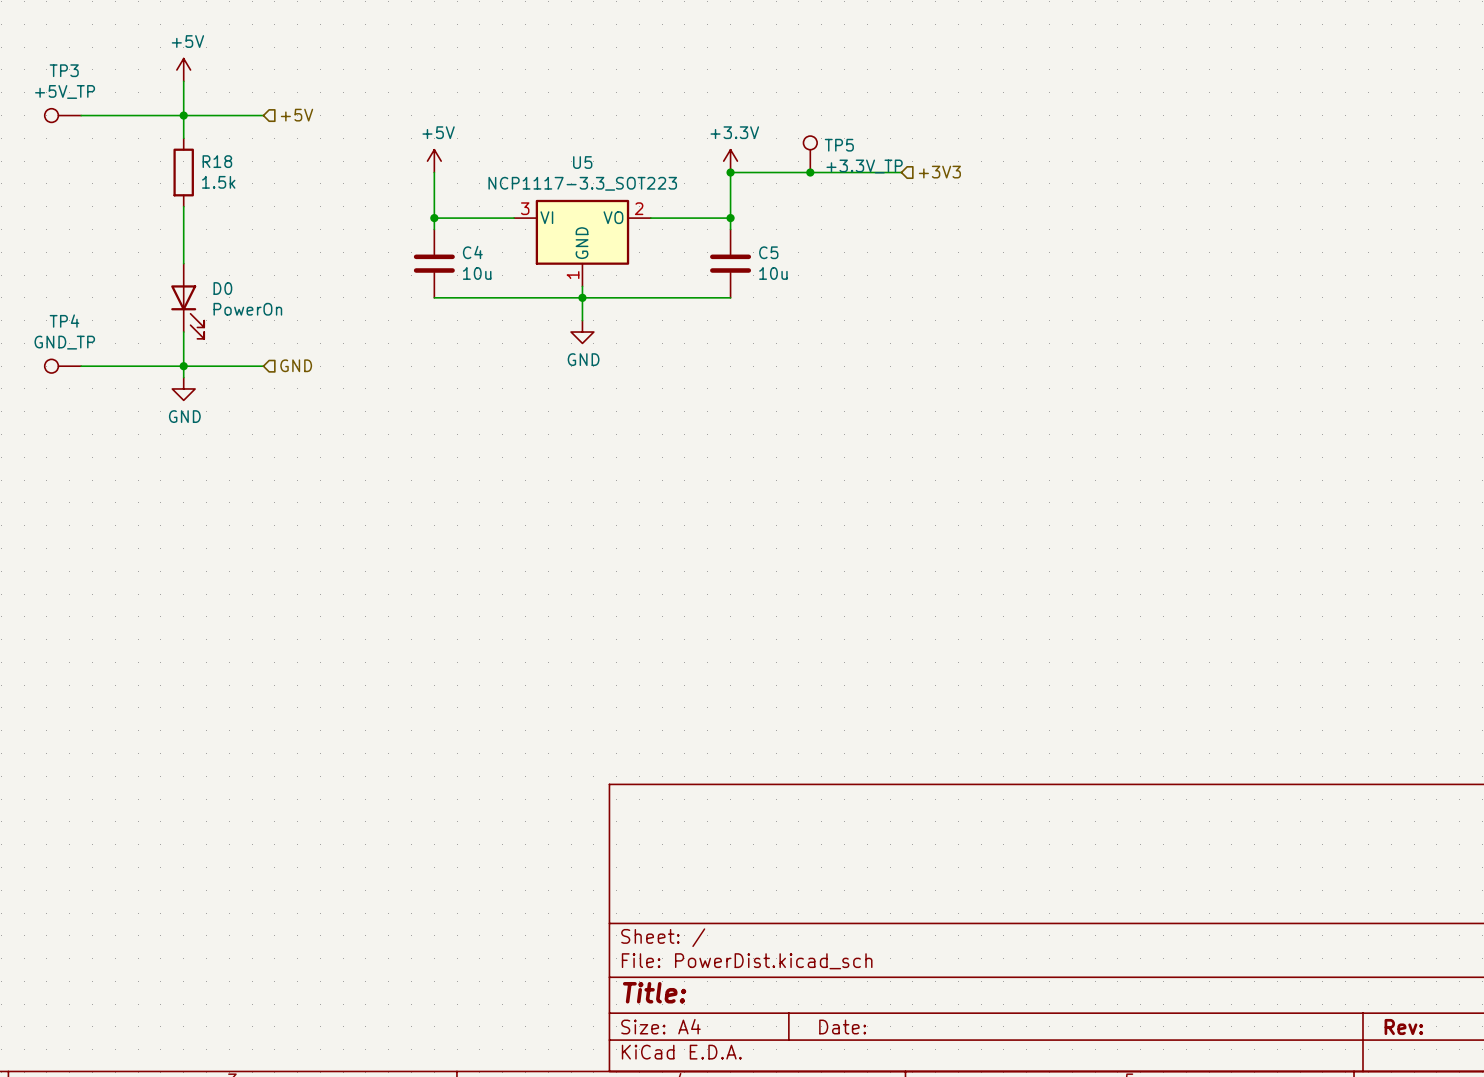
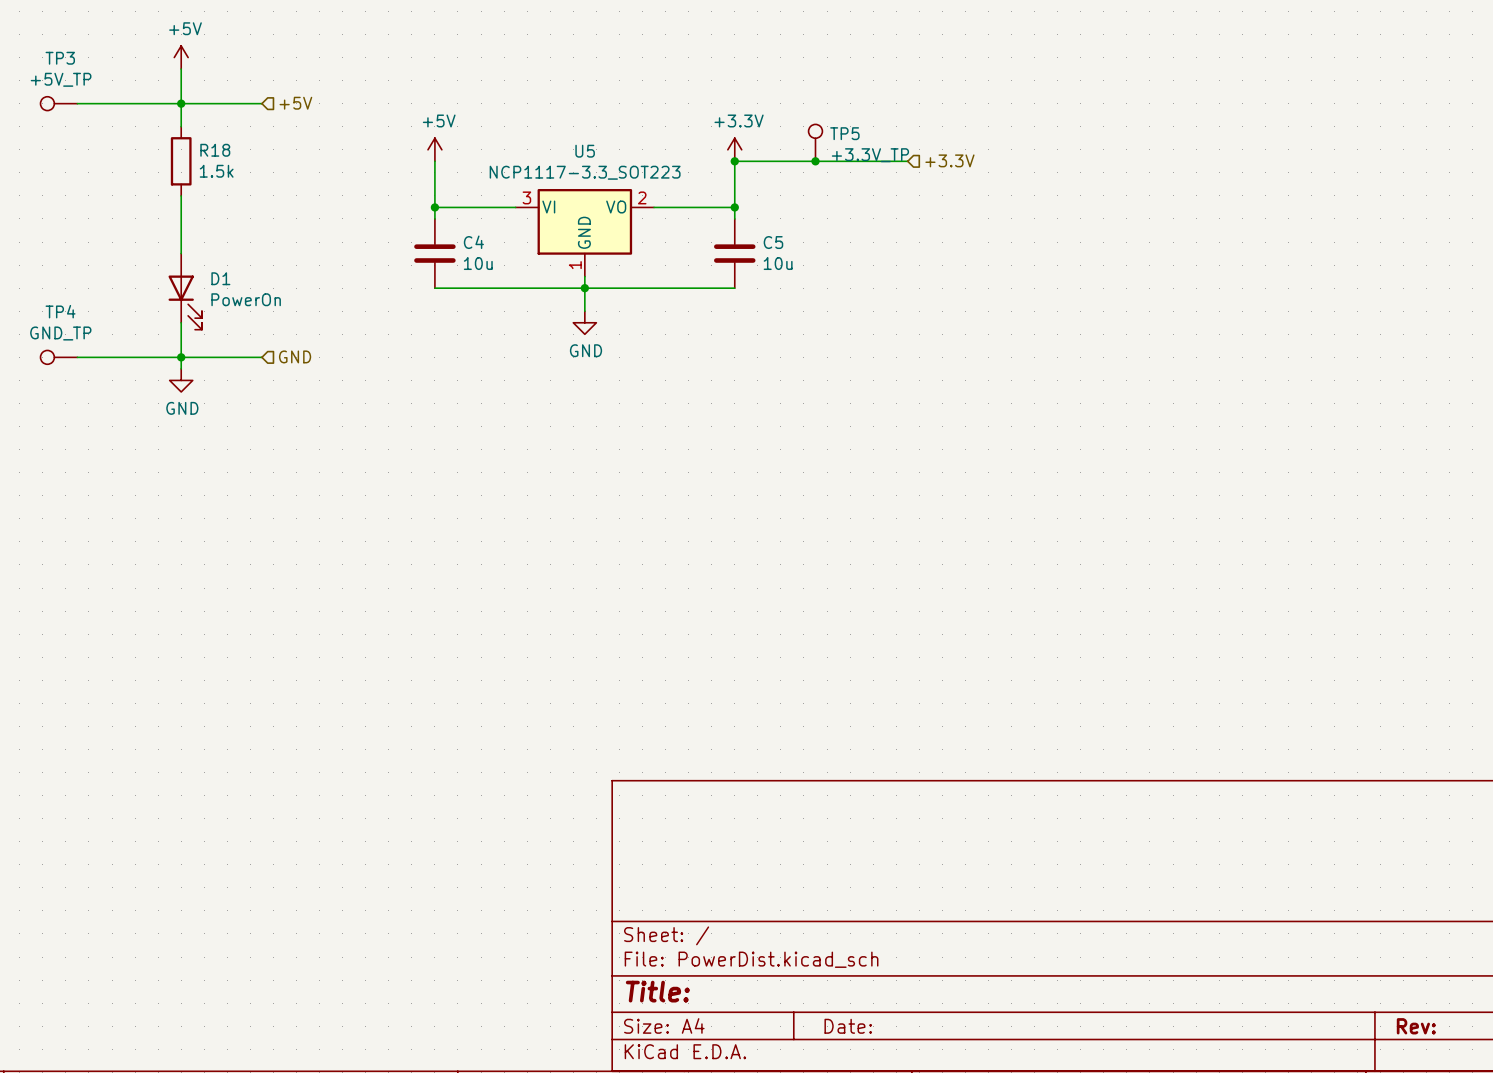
hierarchical label: +3V3 (939, 172) -> +3.3V (949, 160)
D0 name: D0 (222, 288) -> D1 (220, 278)

